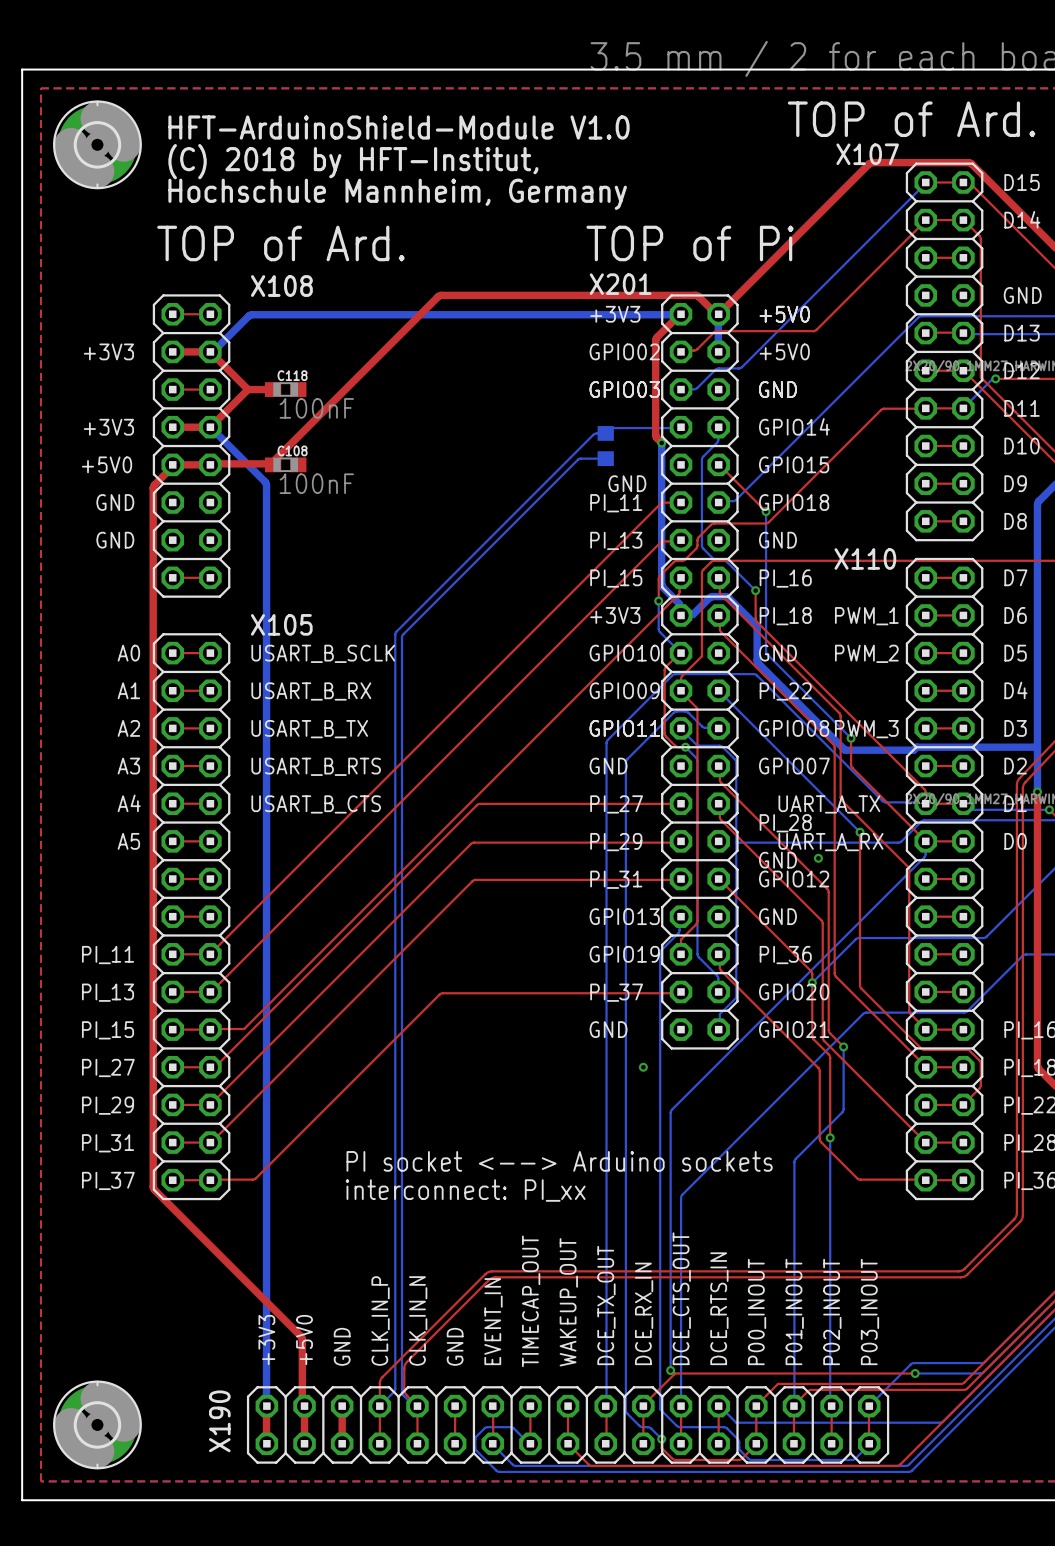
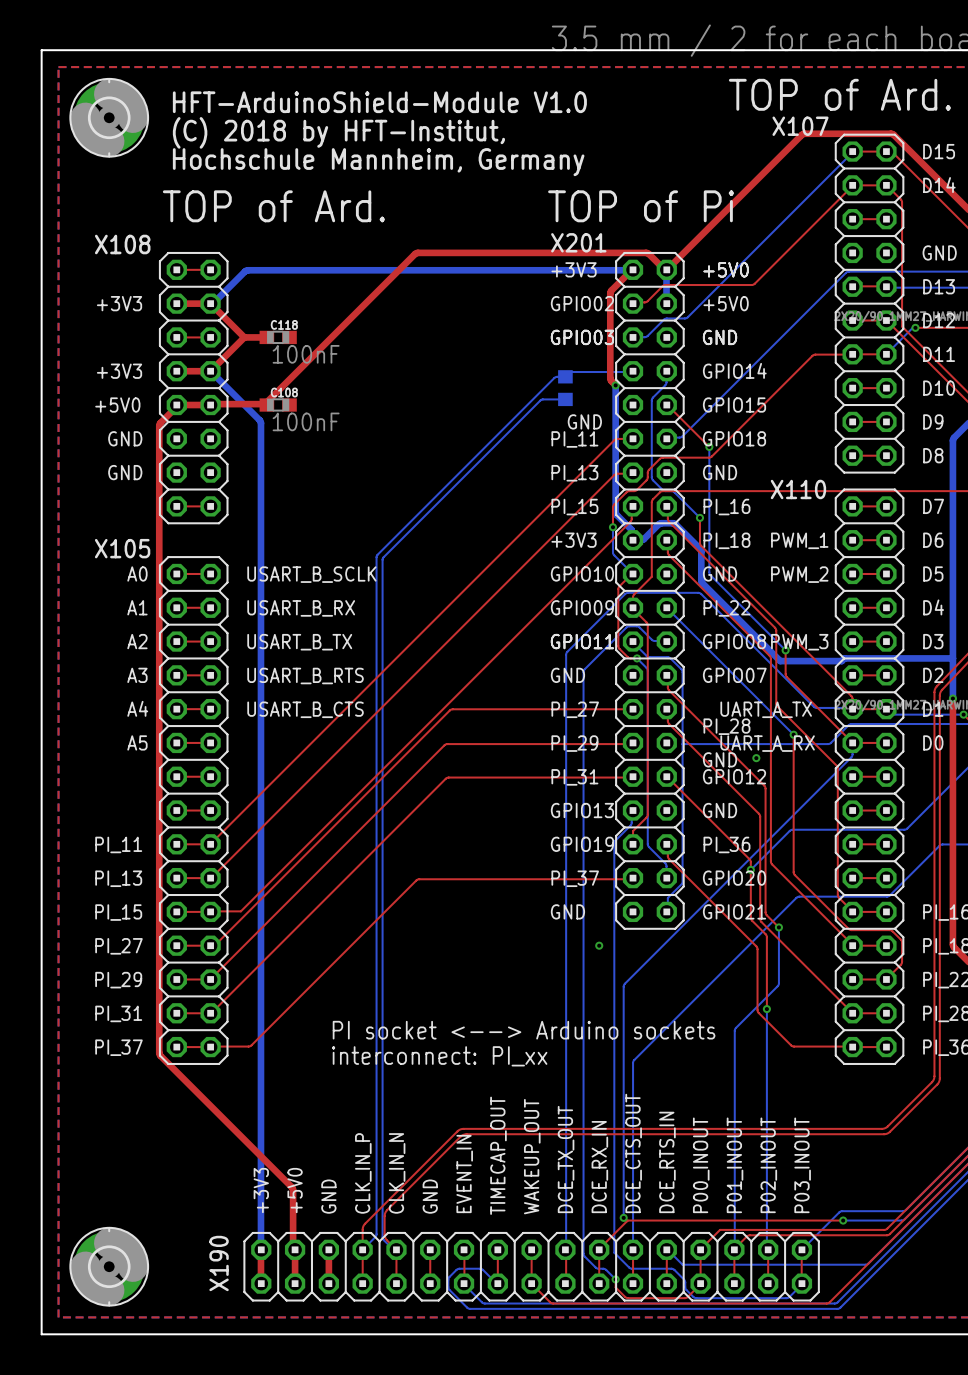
X108 name position: X108 (281, 286) -> X108 (122, 244)
X105 name position: X105 (281, 624) -> X105 (122, 548)

